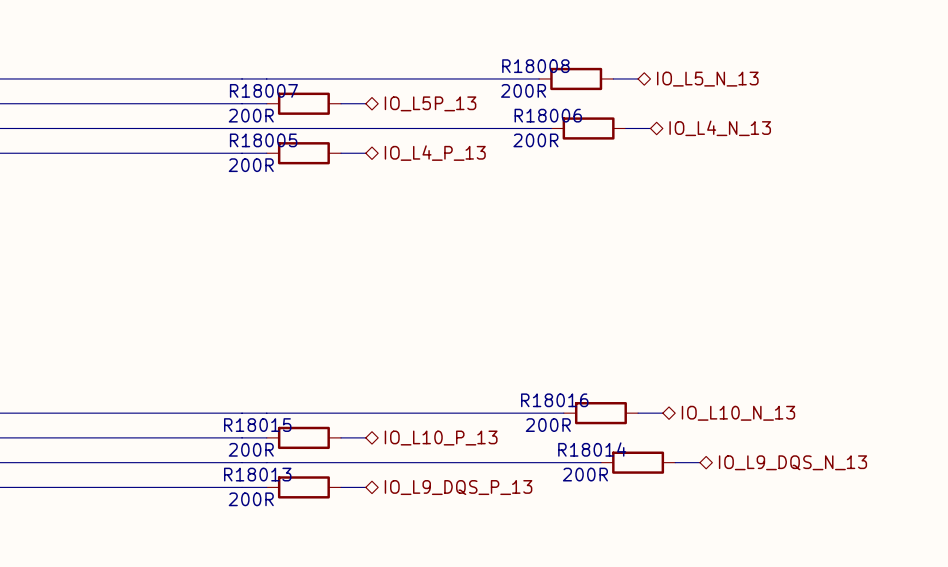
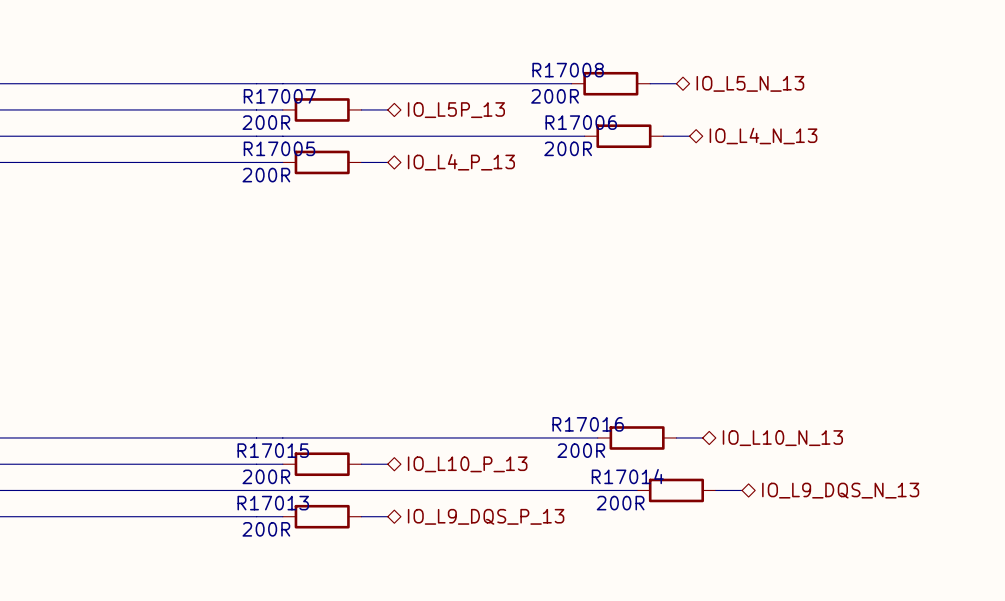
R18008 name: R18008 (535, 66) -> R17008 (568, 70)
R18007 name: R18007 (263, 90) -> R17007 (279, 96)
R18006 name: R18006 (548, 115) -> R17006 (581, 122)
R18005 name: R18005 (263, 140) -> R17005 (279, 148)
R18016 name: R18016 (554, 400) -> R17016 (588, 424)
R18015 name: R18015 (257, 425) -> R17015 (273, 450)
R18014 name: R18014 (592, 449) -> R17014 (627, 476)
R18013 name: R18013 (257, 474) -> R17013 (273, 503)

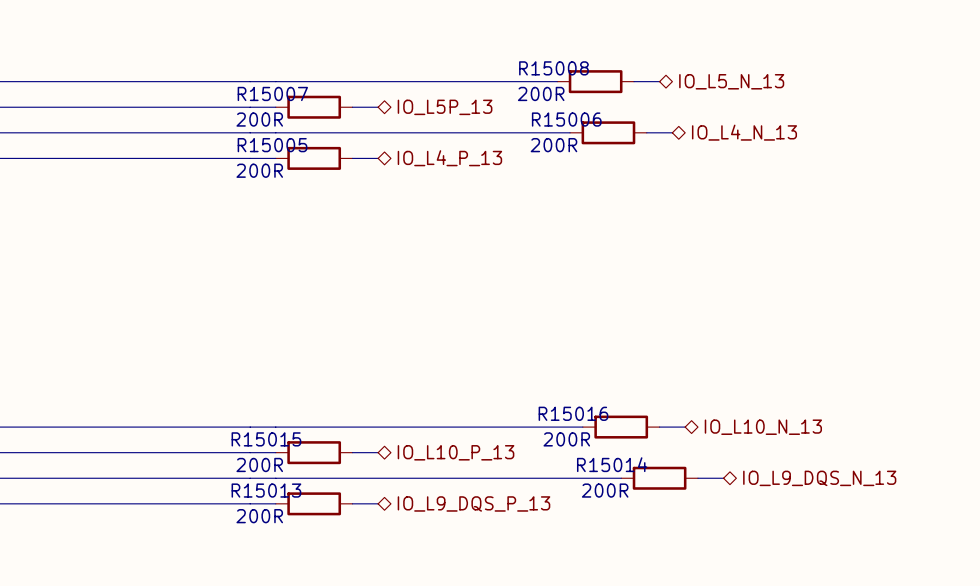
R17008 name: R17008 (568, 70) -> R15008 (553, 68)
R17007 name: R17007 (279, 96) -> R15007 (272, 93)
R17006 name: R17006 (581, 122) -> R15006 (566, 119)
R17005 name: R17005 (279, 148) -> R15005 (272, 145)
R17016 name: R17016 (588, 424) -> R15016 (573, 413)
R17015 name: R17015 (273, 450) -> R15015 (266, 439)
R17014 name: R17014 (627, 476) -> R15014 (612, 464)
R17013 name: R17013 (273, 503) -> R15013 (266, 490)

